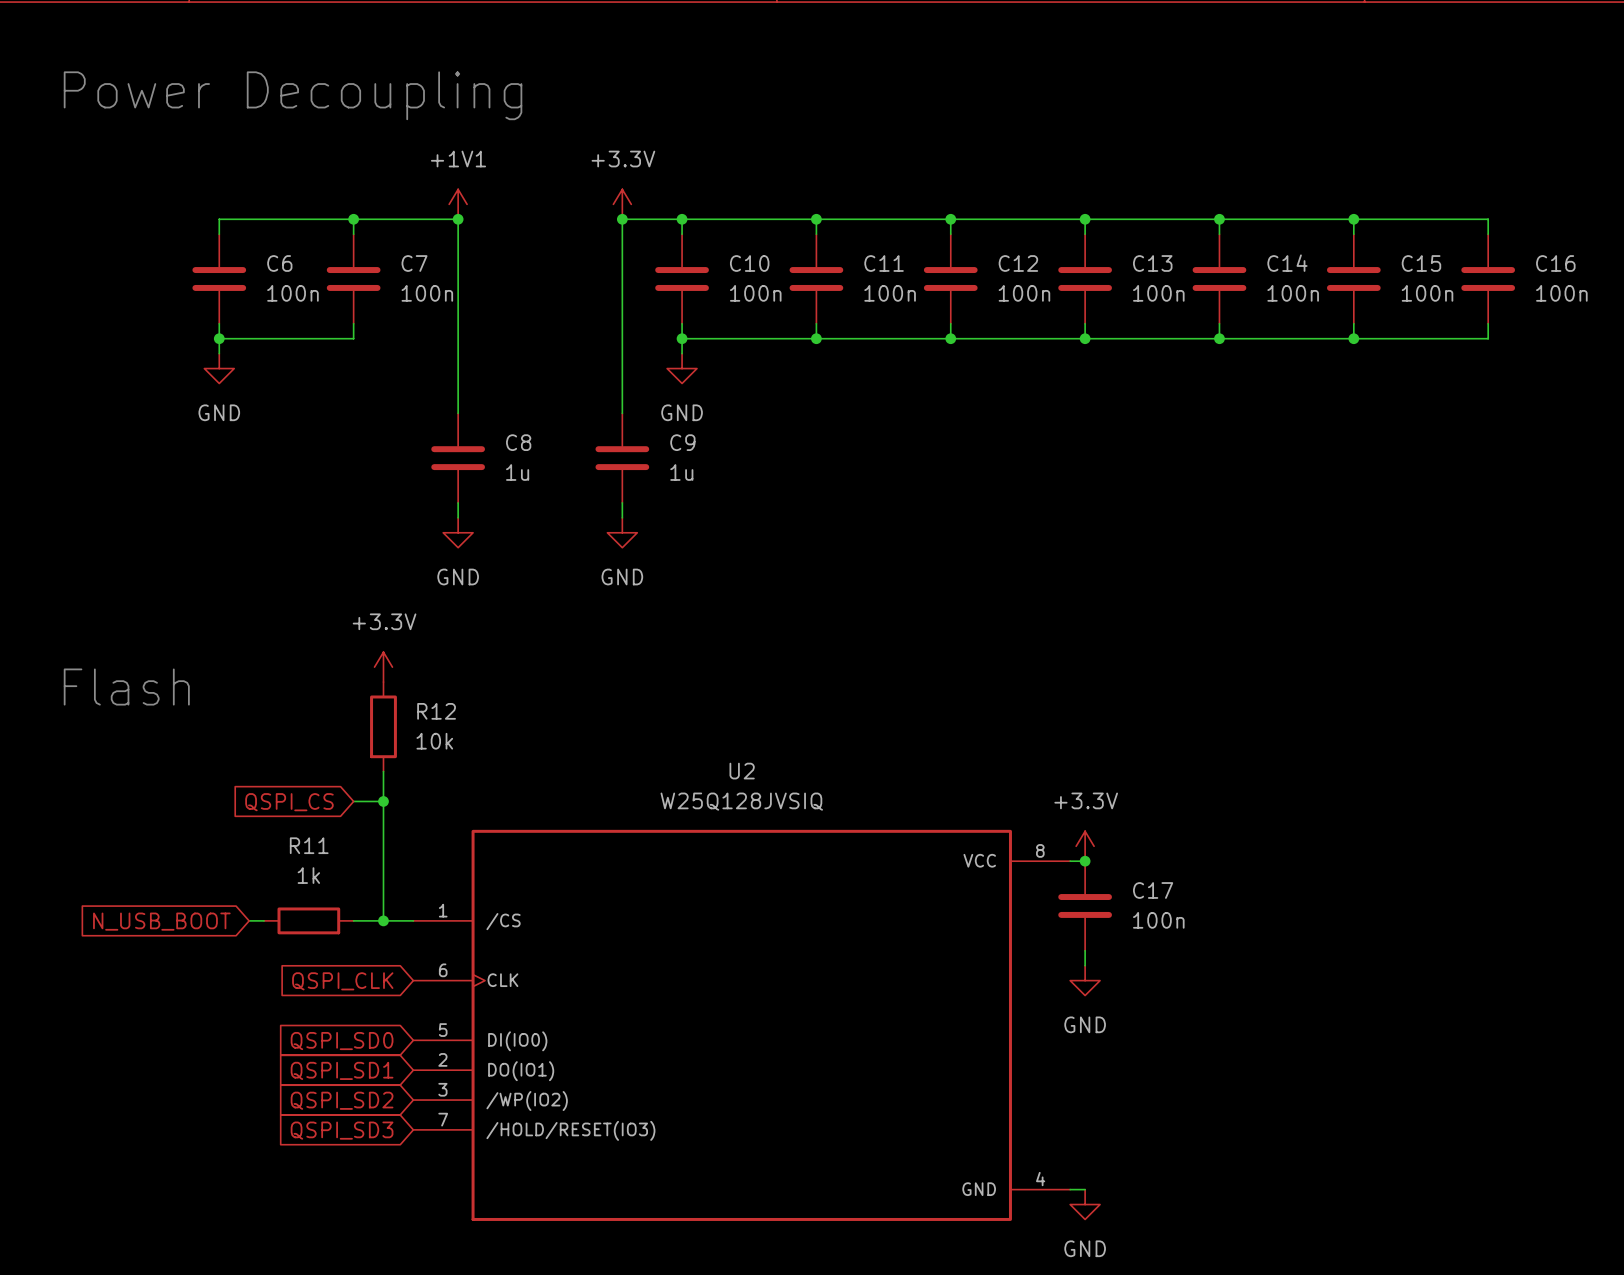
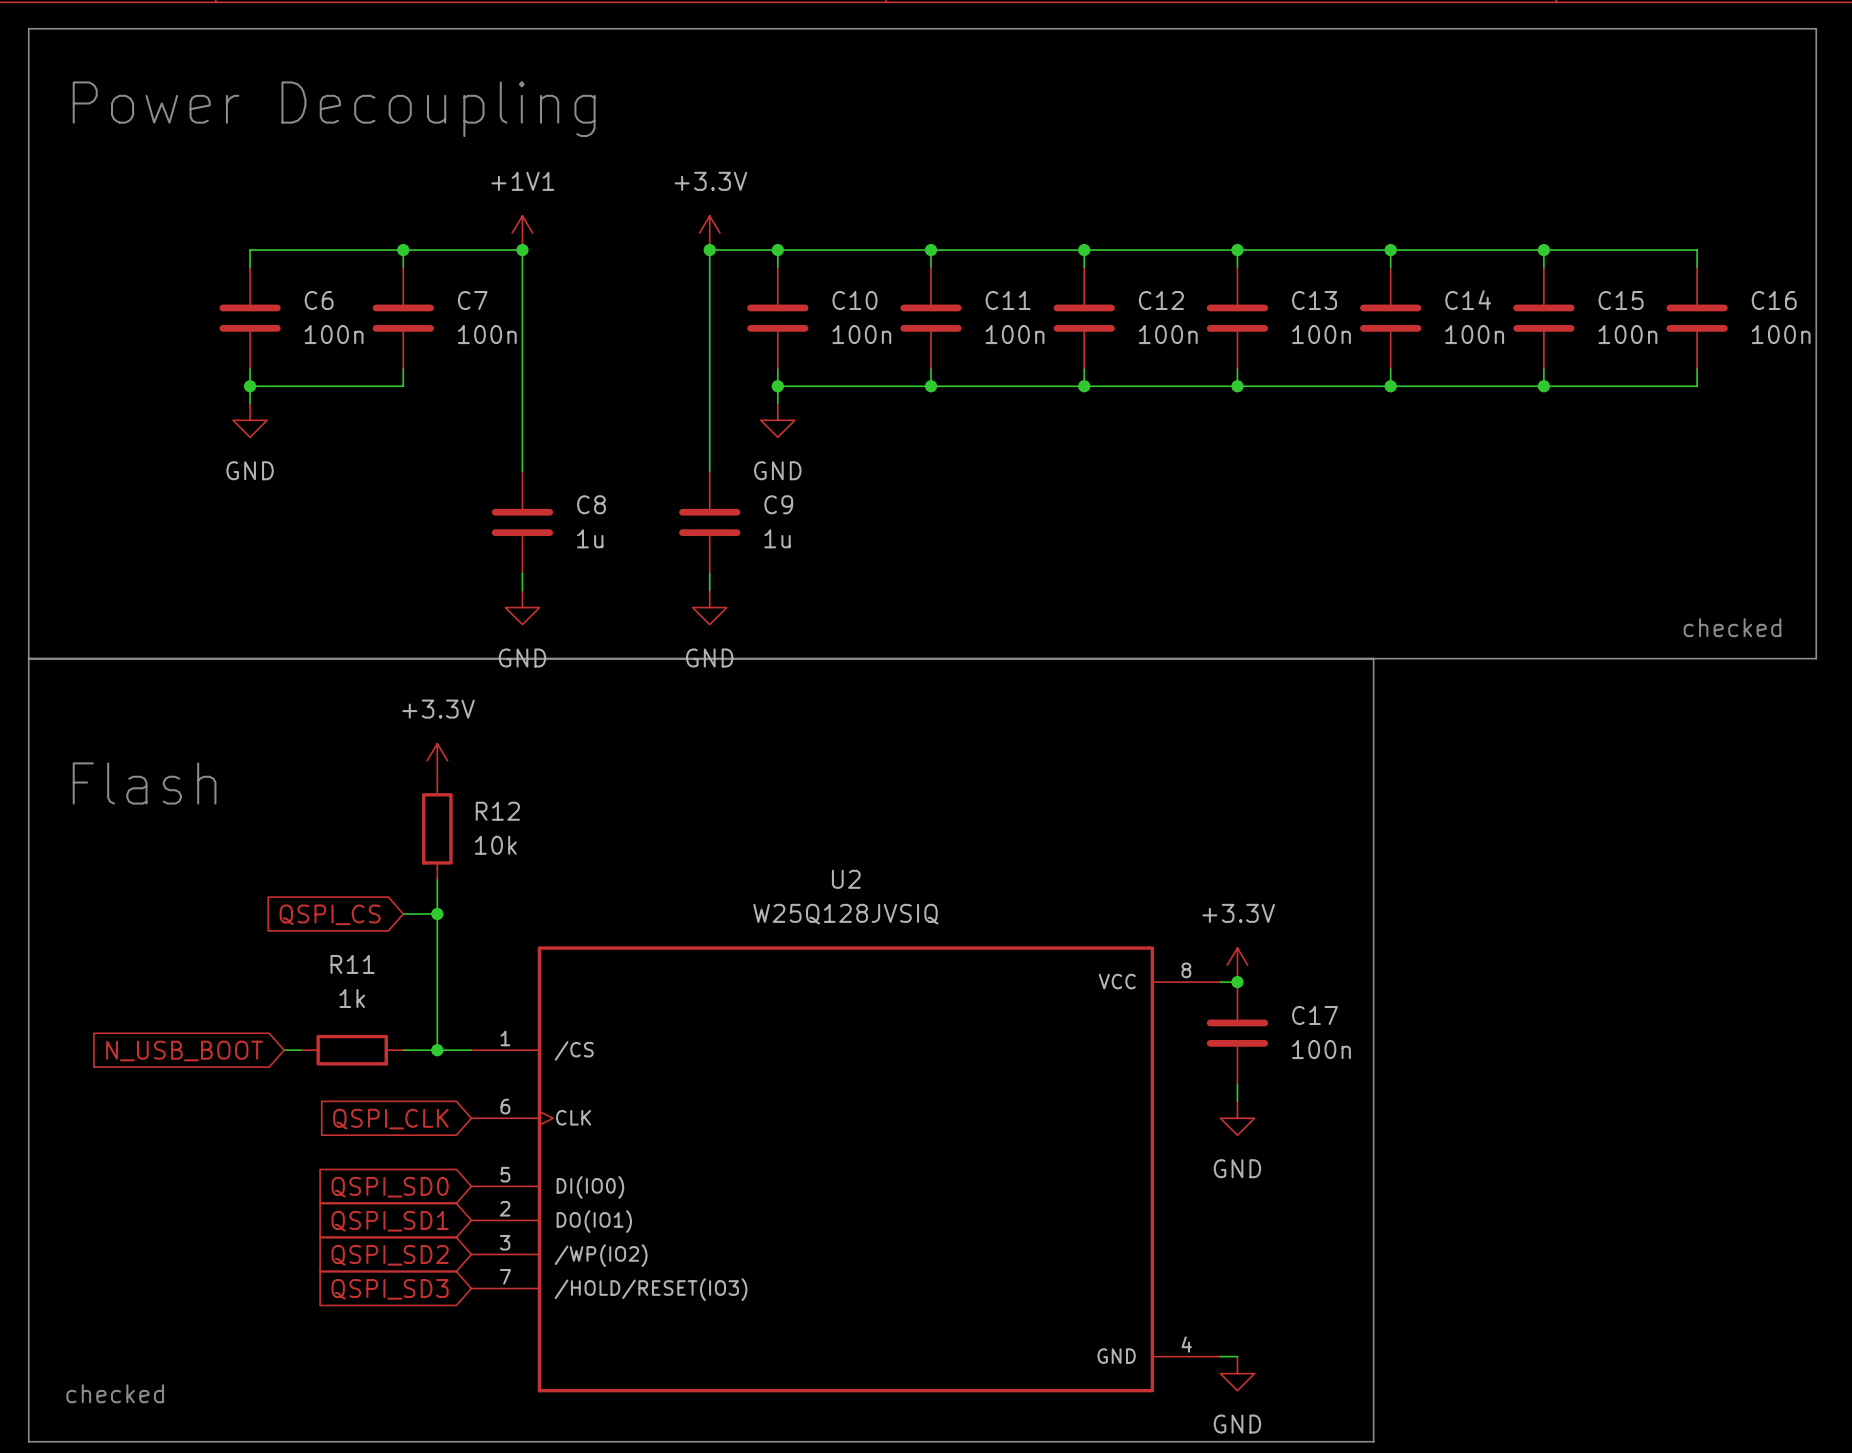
text: none -> checked (1732, 627)
line: none -> (28, 658) (1816, 658) (1816, 28) (28, 28) (28, 1441) (1373, 1441) (1373, 658)
text: none -> checked (115, 1393)

